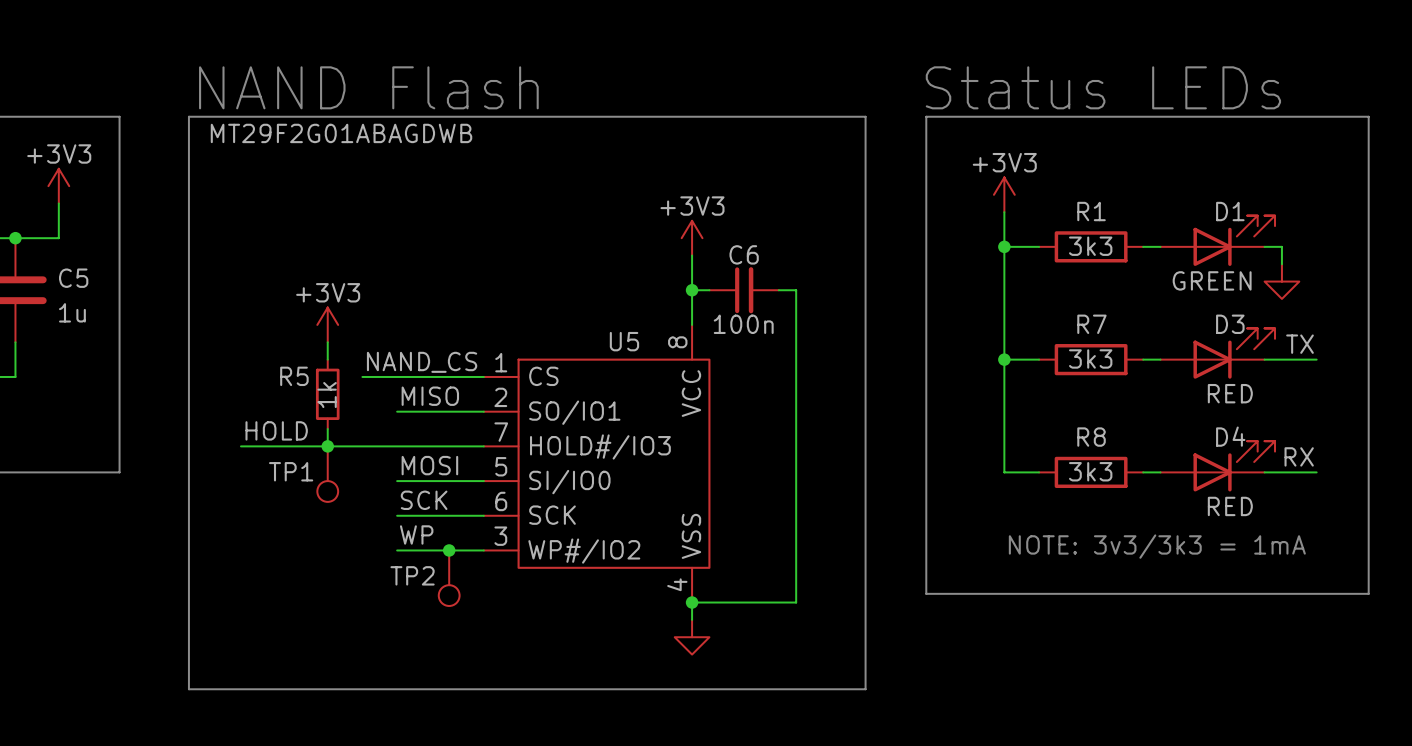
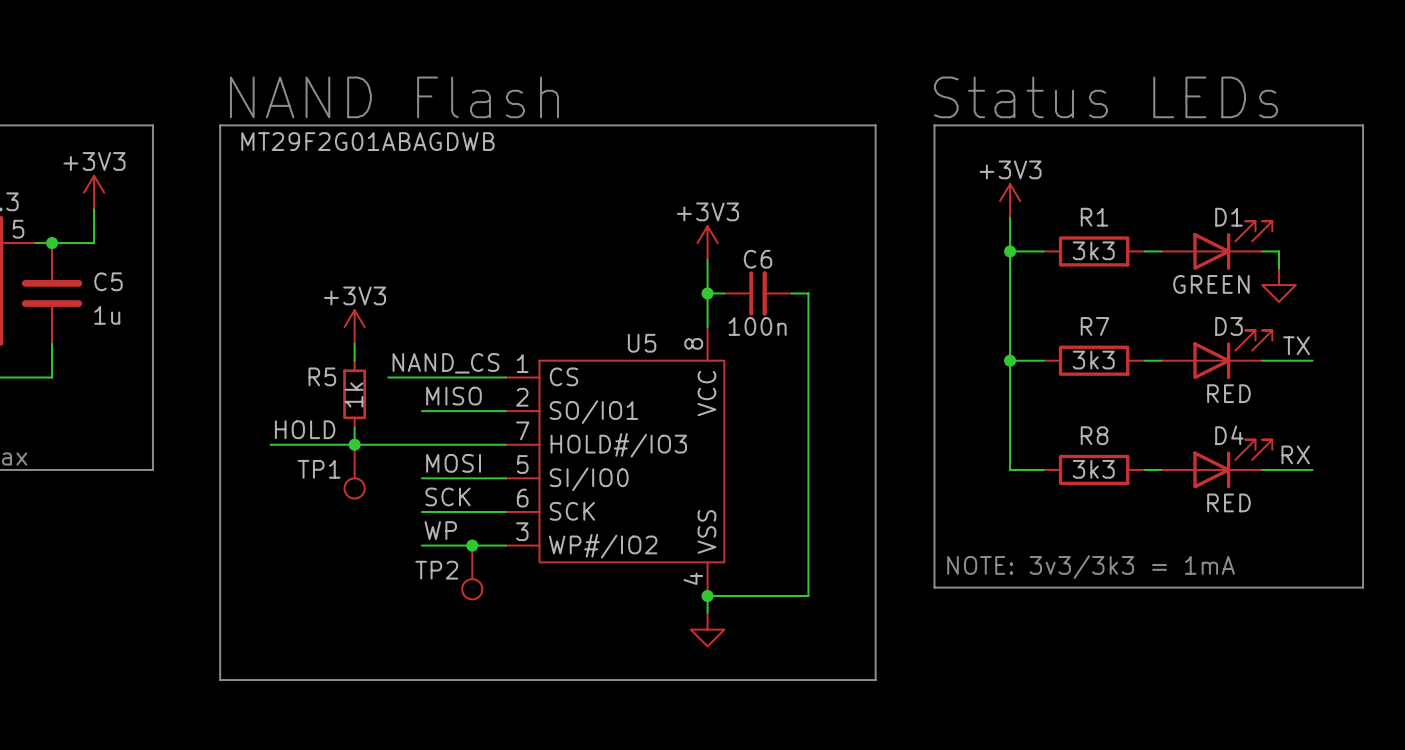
text position: NOTE: 3v3/3k3 = 1mA (1157, 546) -> NOTE: 3v3/3k3 = 1mA (1091, 567)

